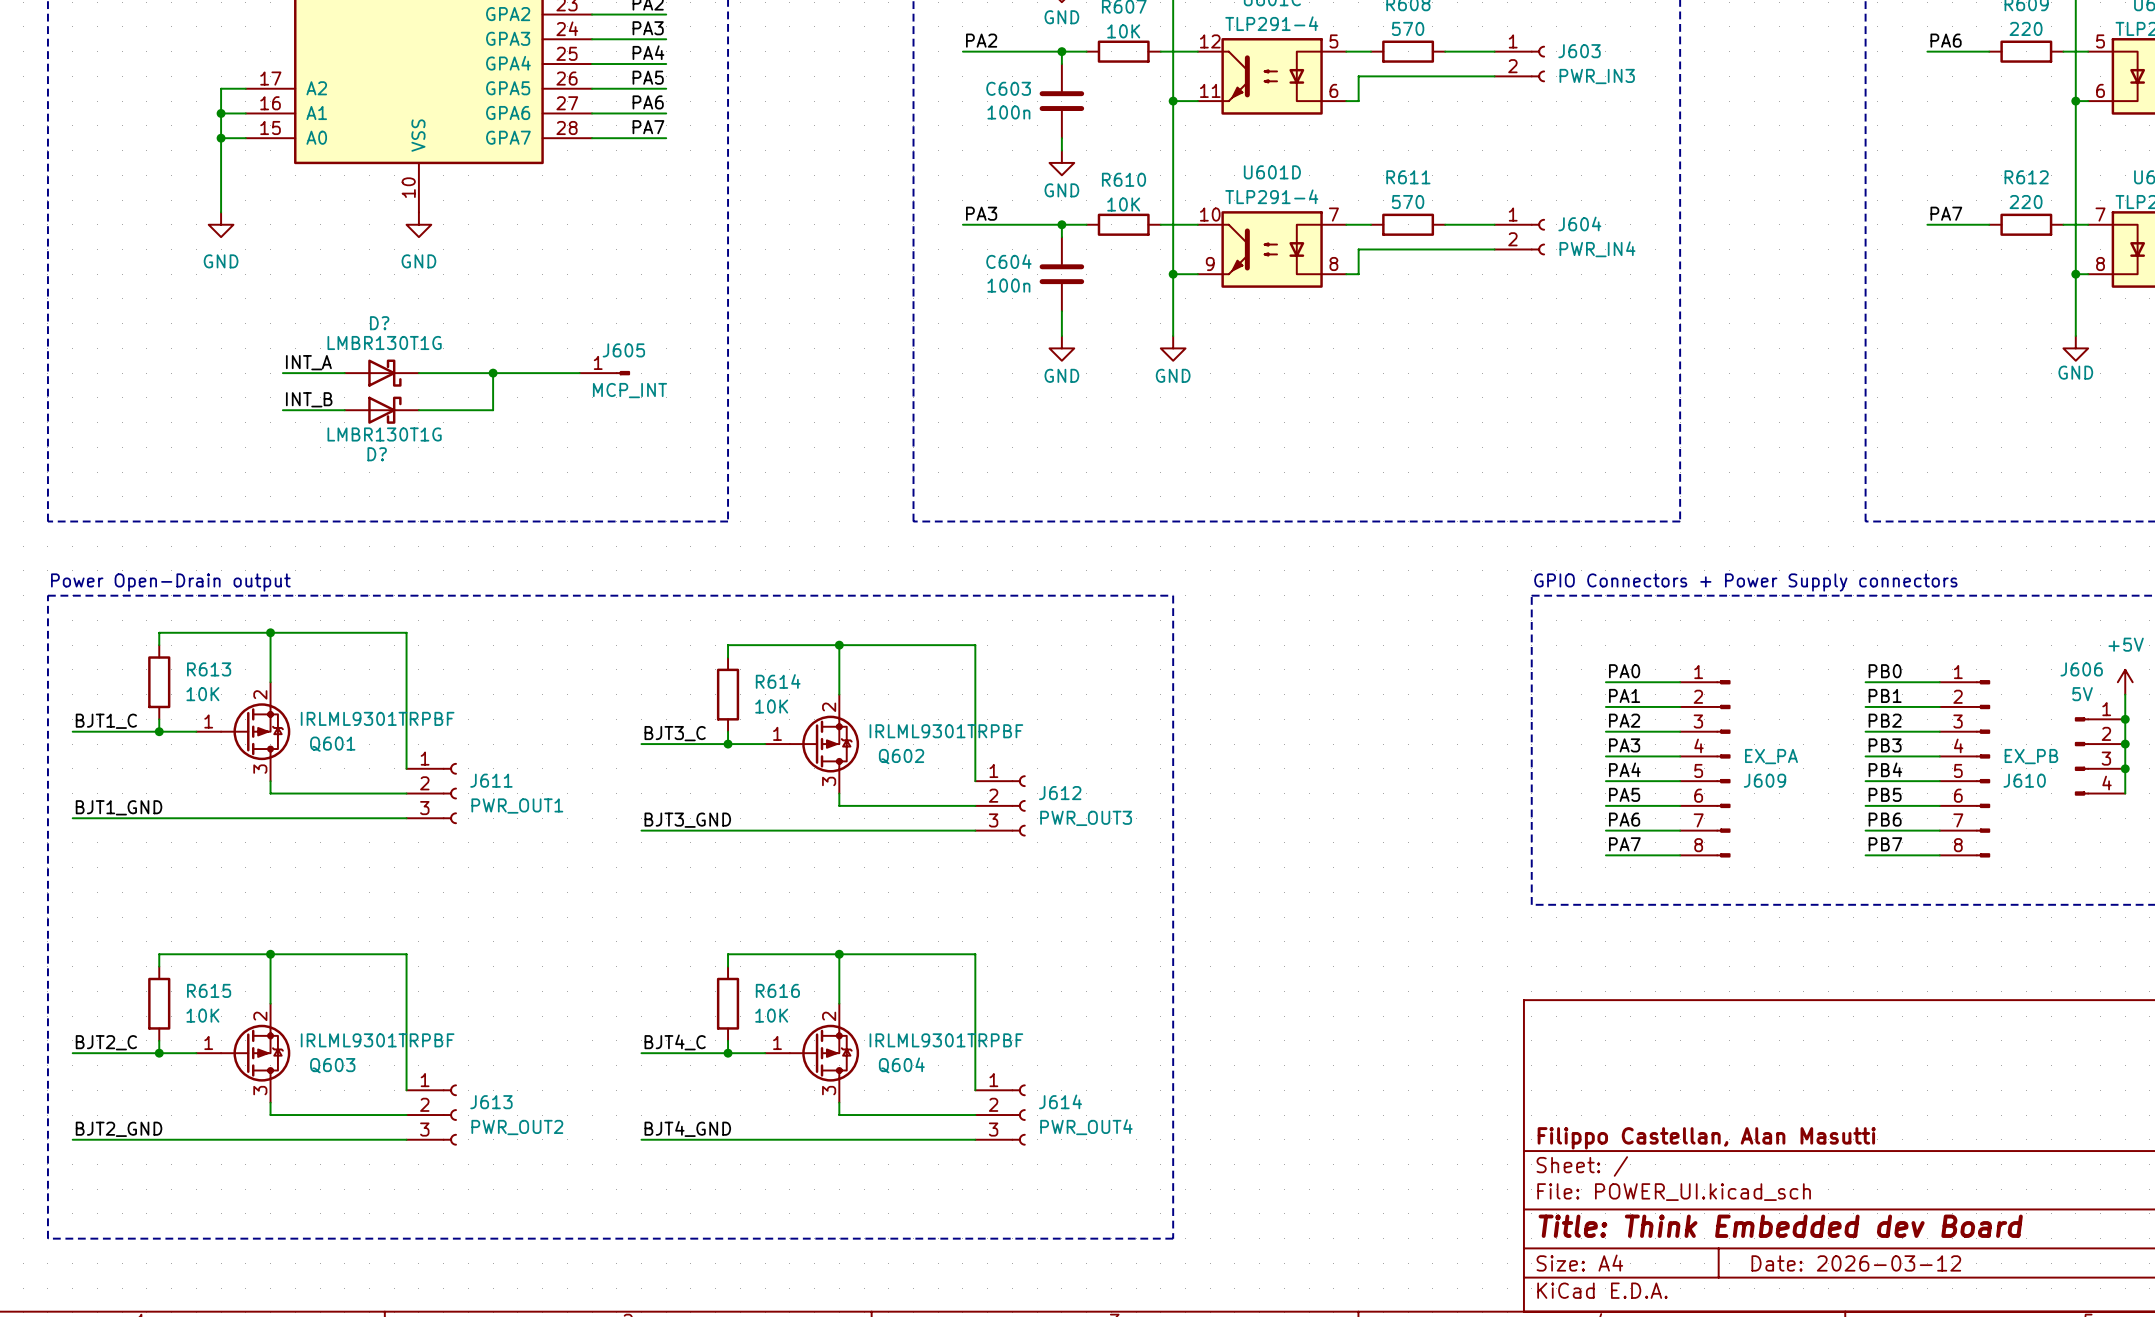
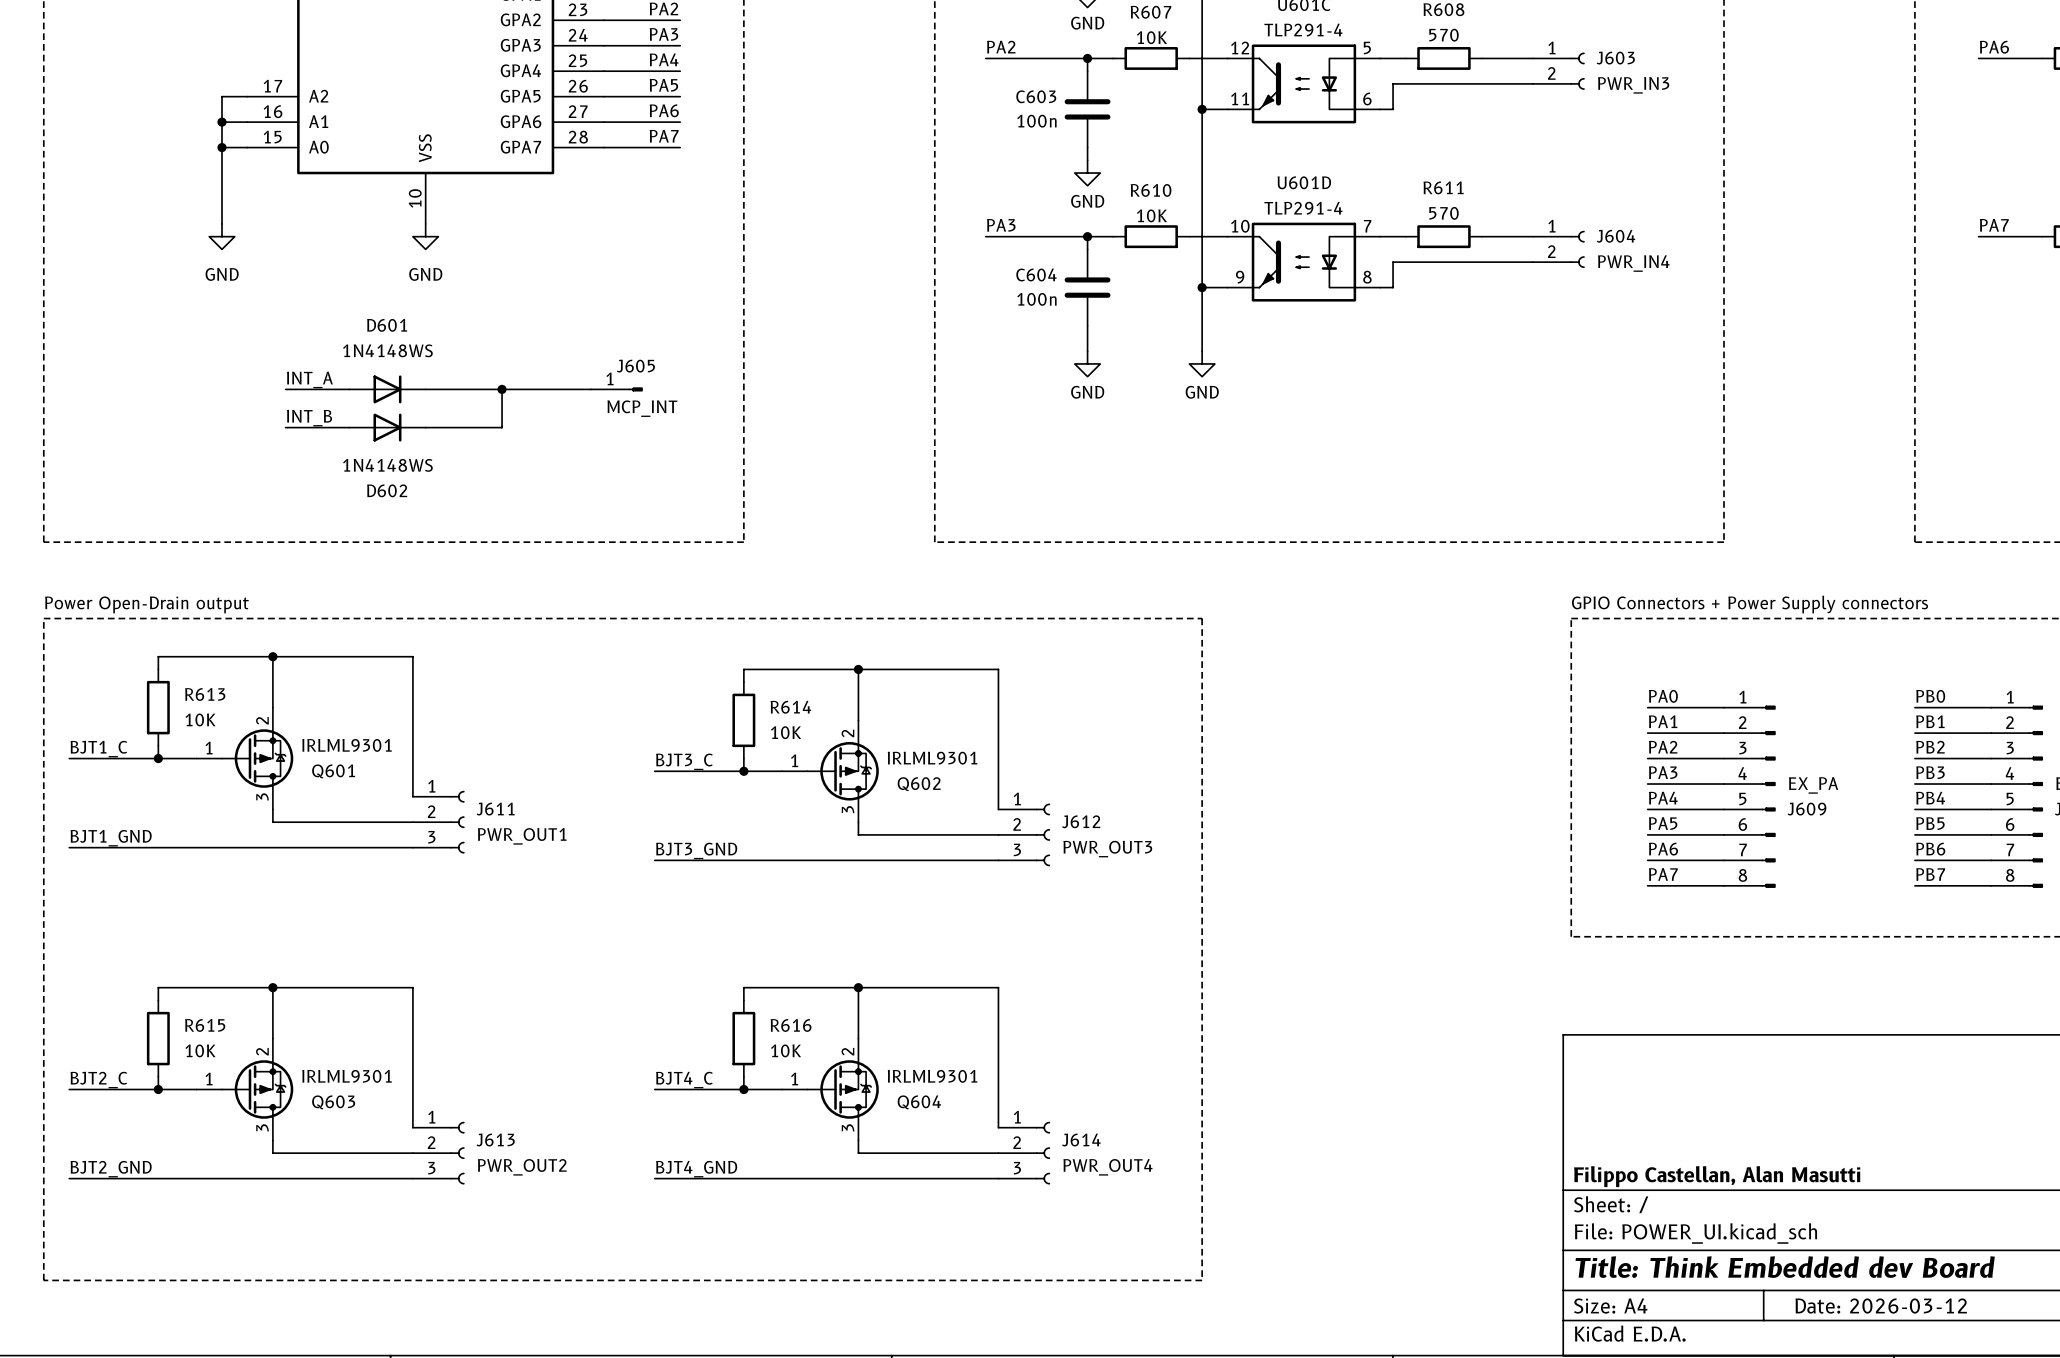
D?: LMBR130T1G (381, 373) -> none
D601: none -> 1N4148WS (387, 389)
D?: LMBR130T1G (381, 410) -> none
D602: none -> 1N4148WS (387, 427)
Q601 value: IRLML9301TRPBF (377, 718) -> IRLML9301 (347, 745)
Q602 value: IRLML9301TRPBF (946, 731) -> IRLML9301 (932, 758)
Q603 value: IRLML9301TRPBF (377, 1040) -> IRLML9301 (347, 1076)
Q604 value: IRLML9301TRPBF (946, 1040) -> IRLML9301 (932, 1076)

